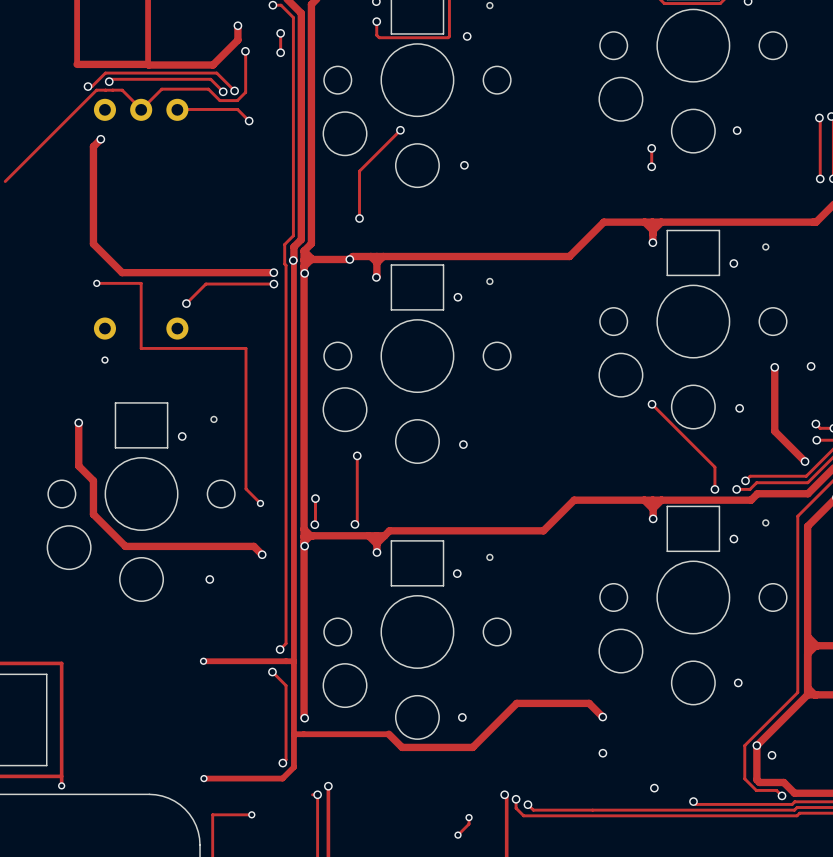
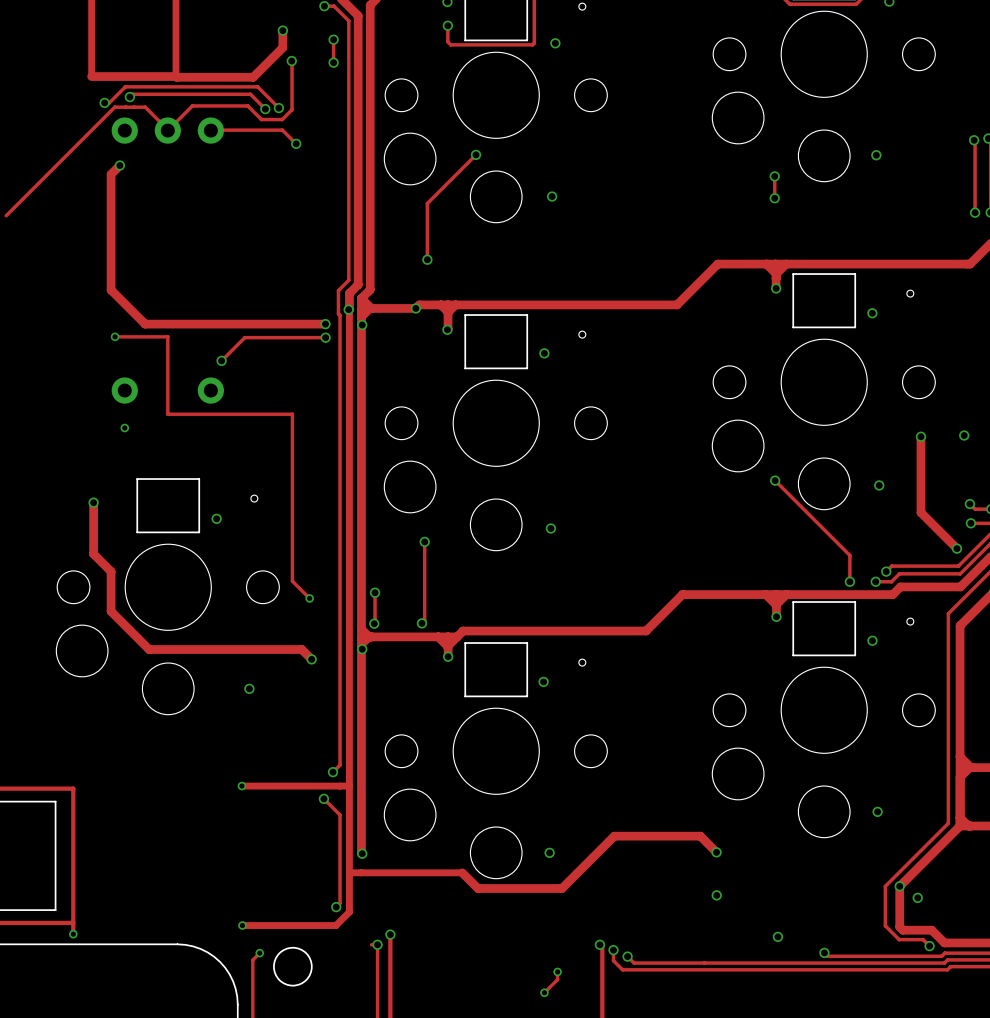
round board edge: none -> [273, 946, 313, 987]
track: (212, 814) (251, 814) -> (252, 968) (252, 960) (259, 953)
via position: (251, 814) -> (259, 953)

